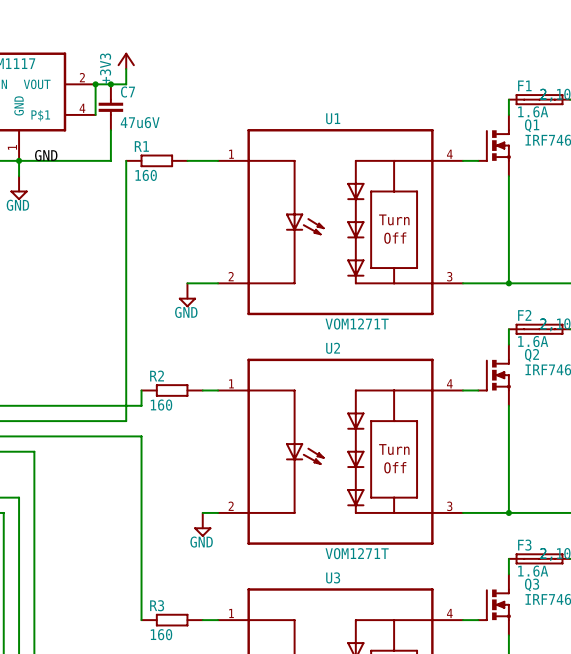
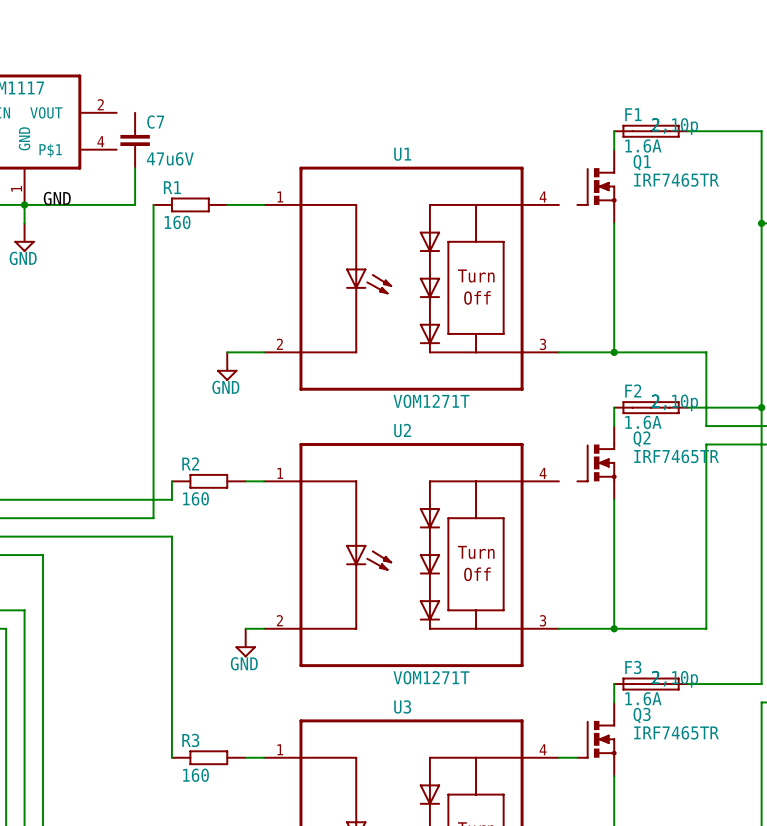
power symbol: +3V3 (126, 60) -> none
wire: (126, 69) (126, 84) (95, 84) (95, 114) -> none
junction: (95, 84) -> none
junction: (110, 84) -> none
wire: (462, 160) (478, 160) -> none
wire: (462, 390) (478, 390) -> none

